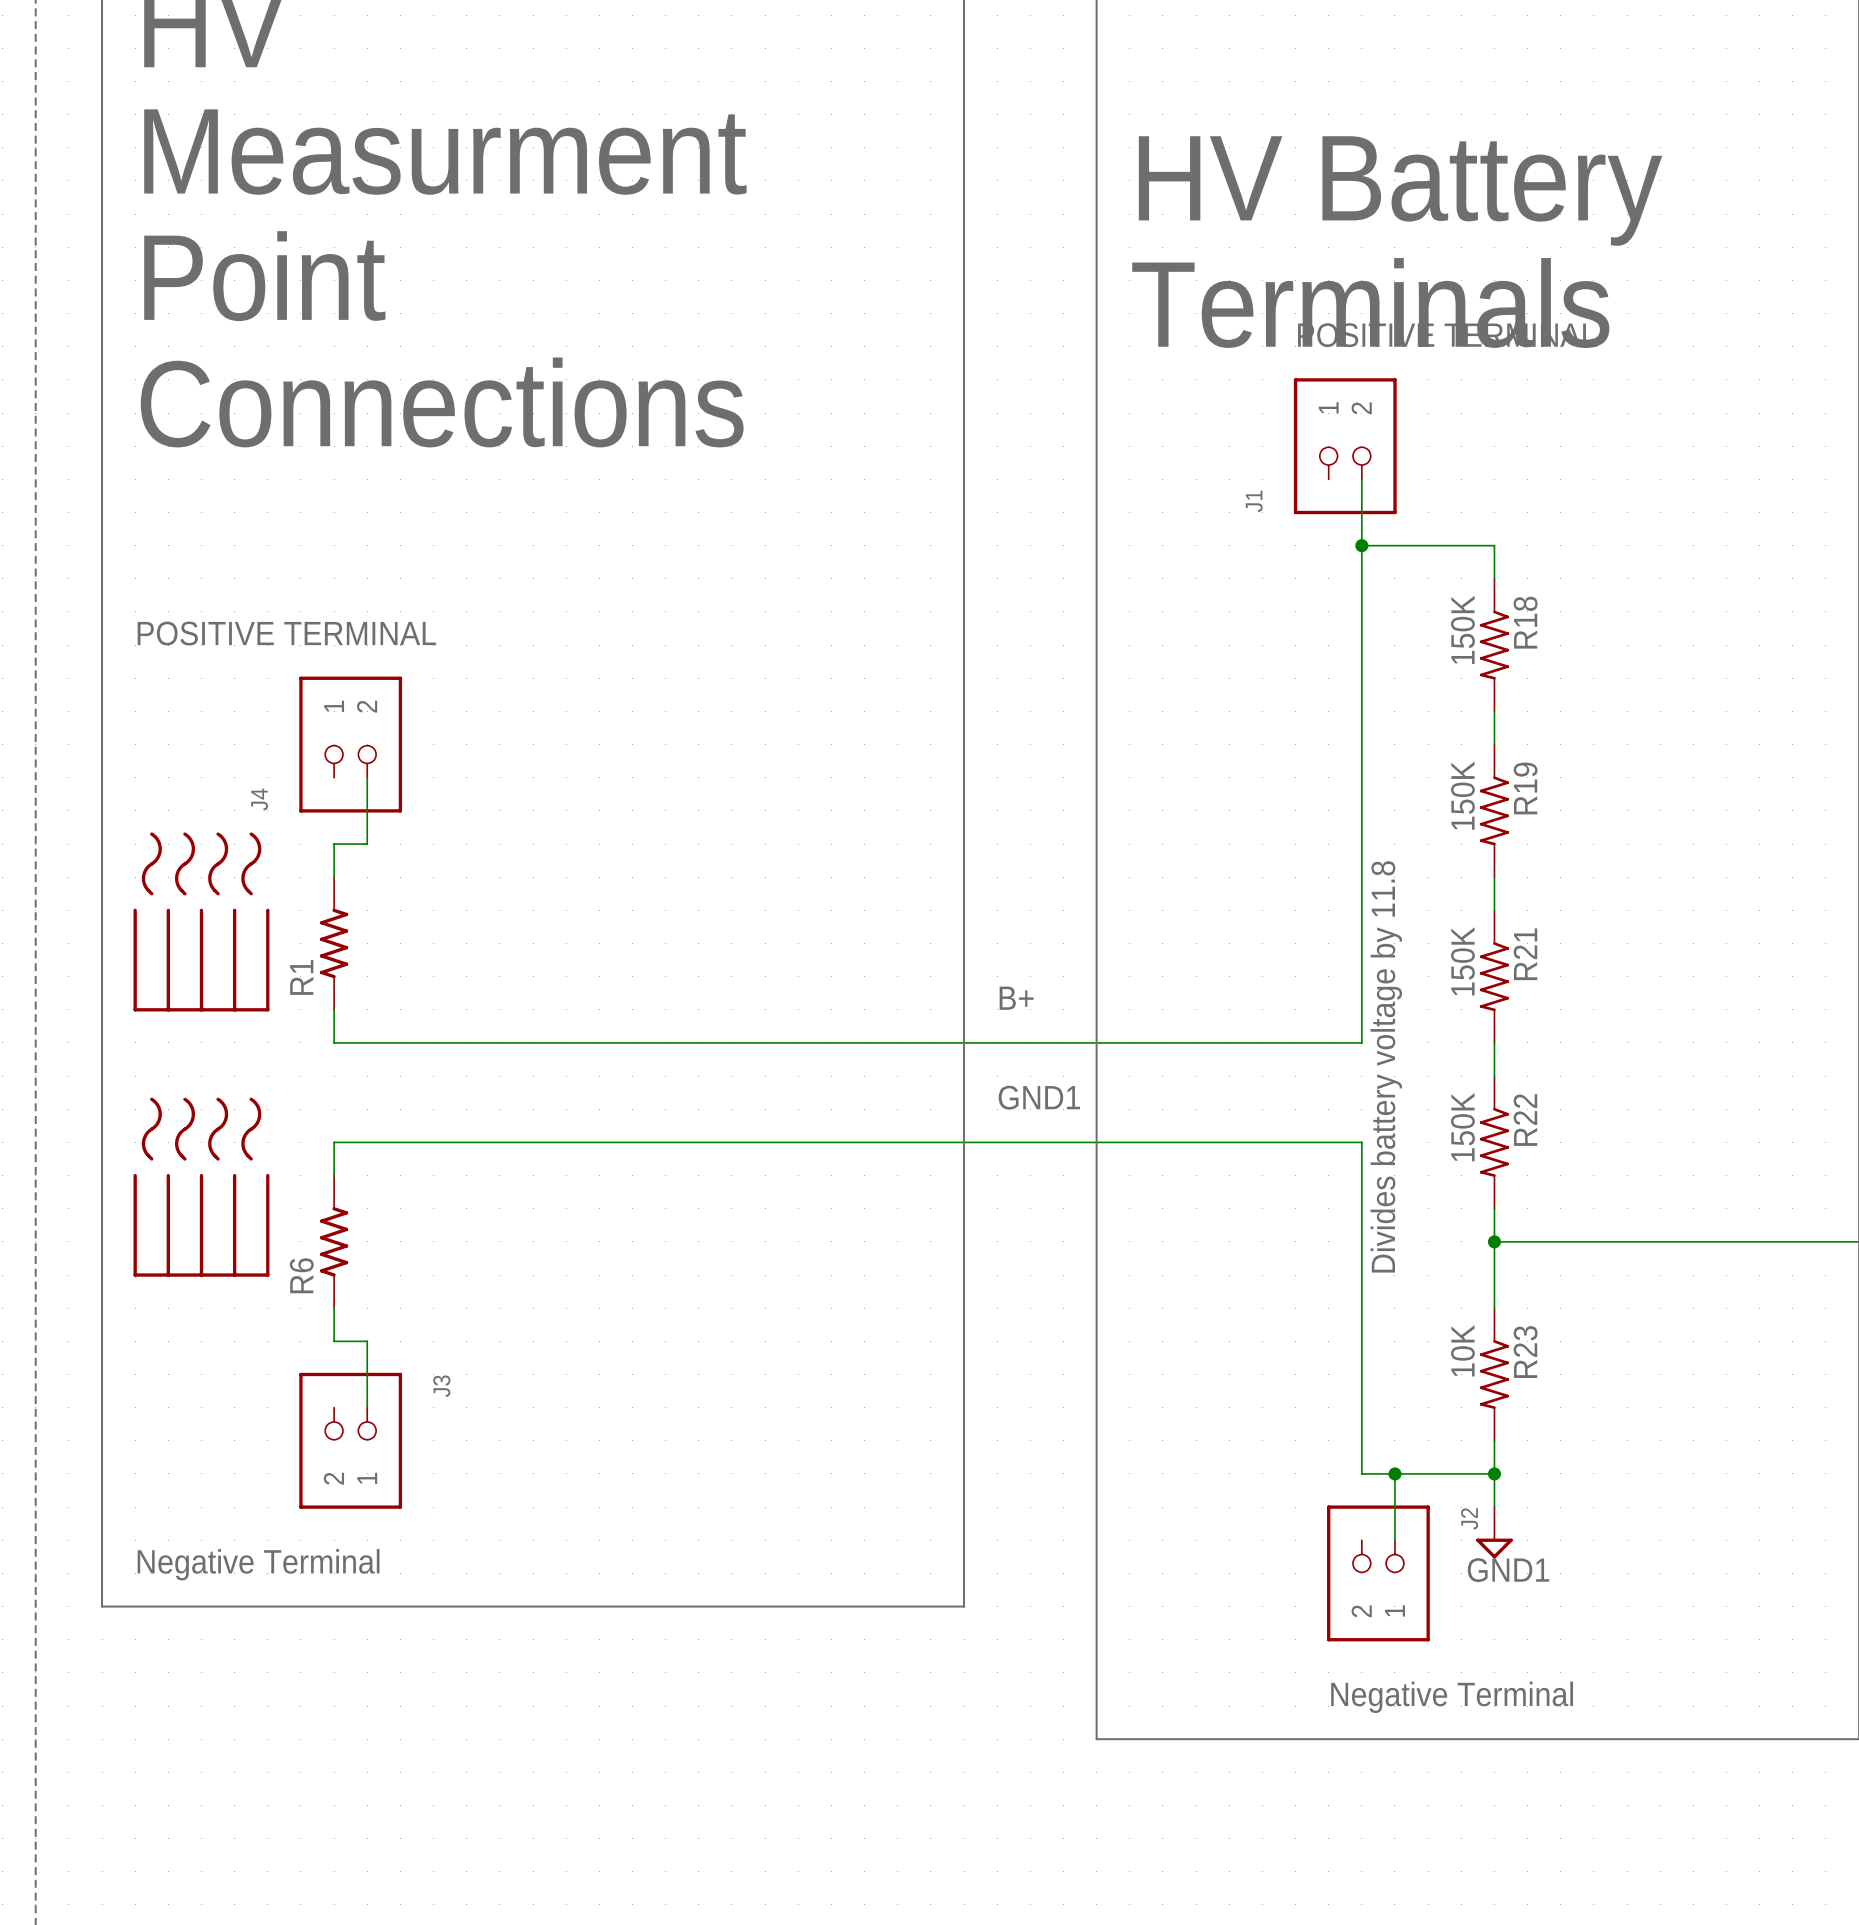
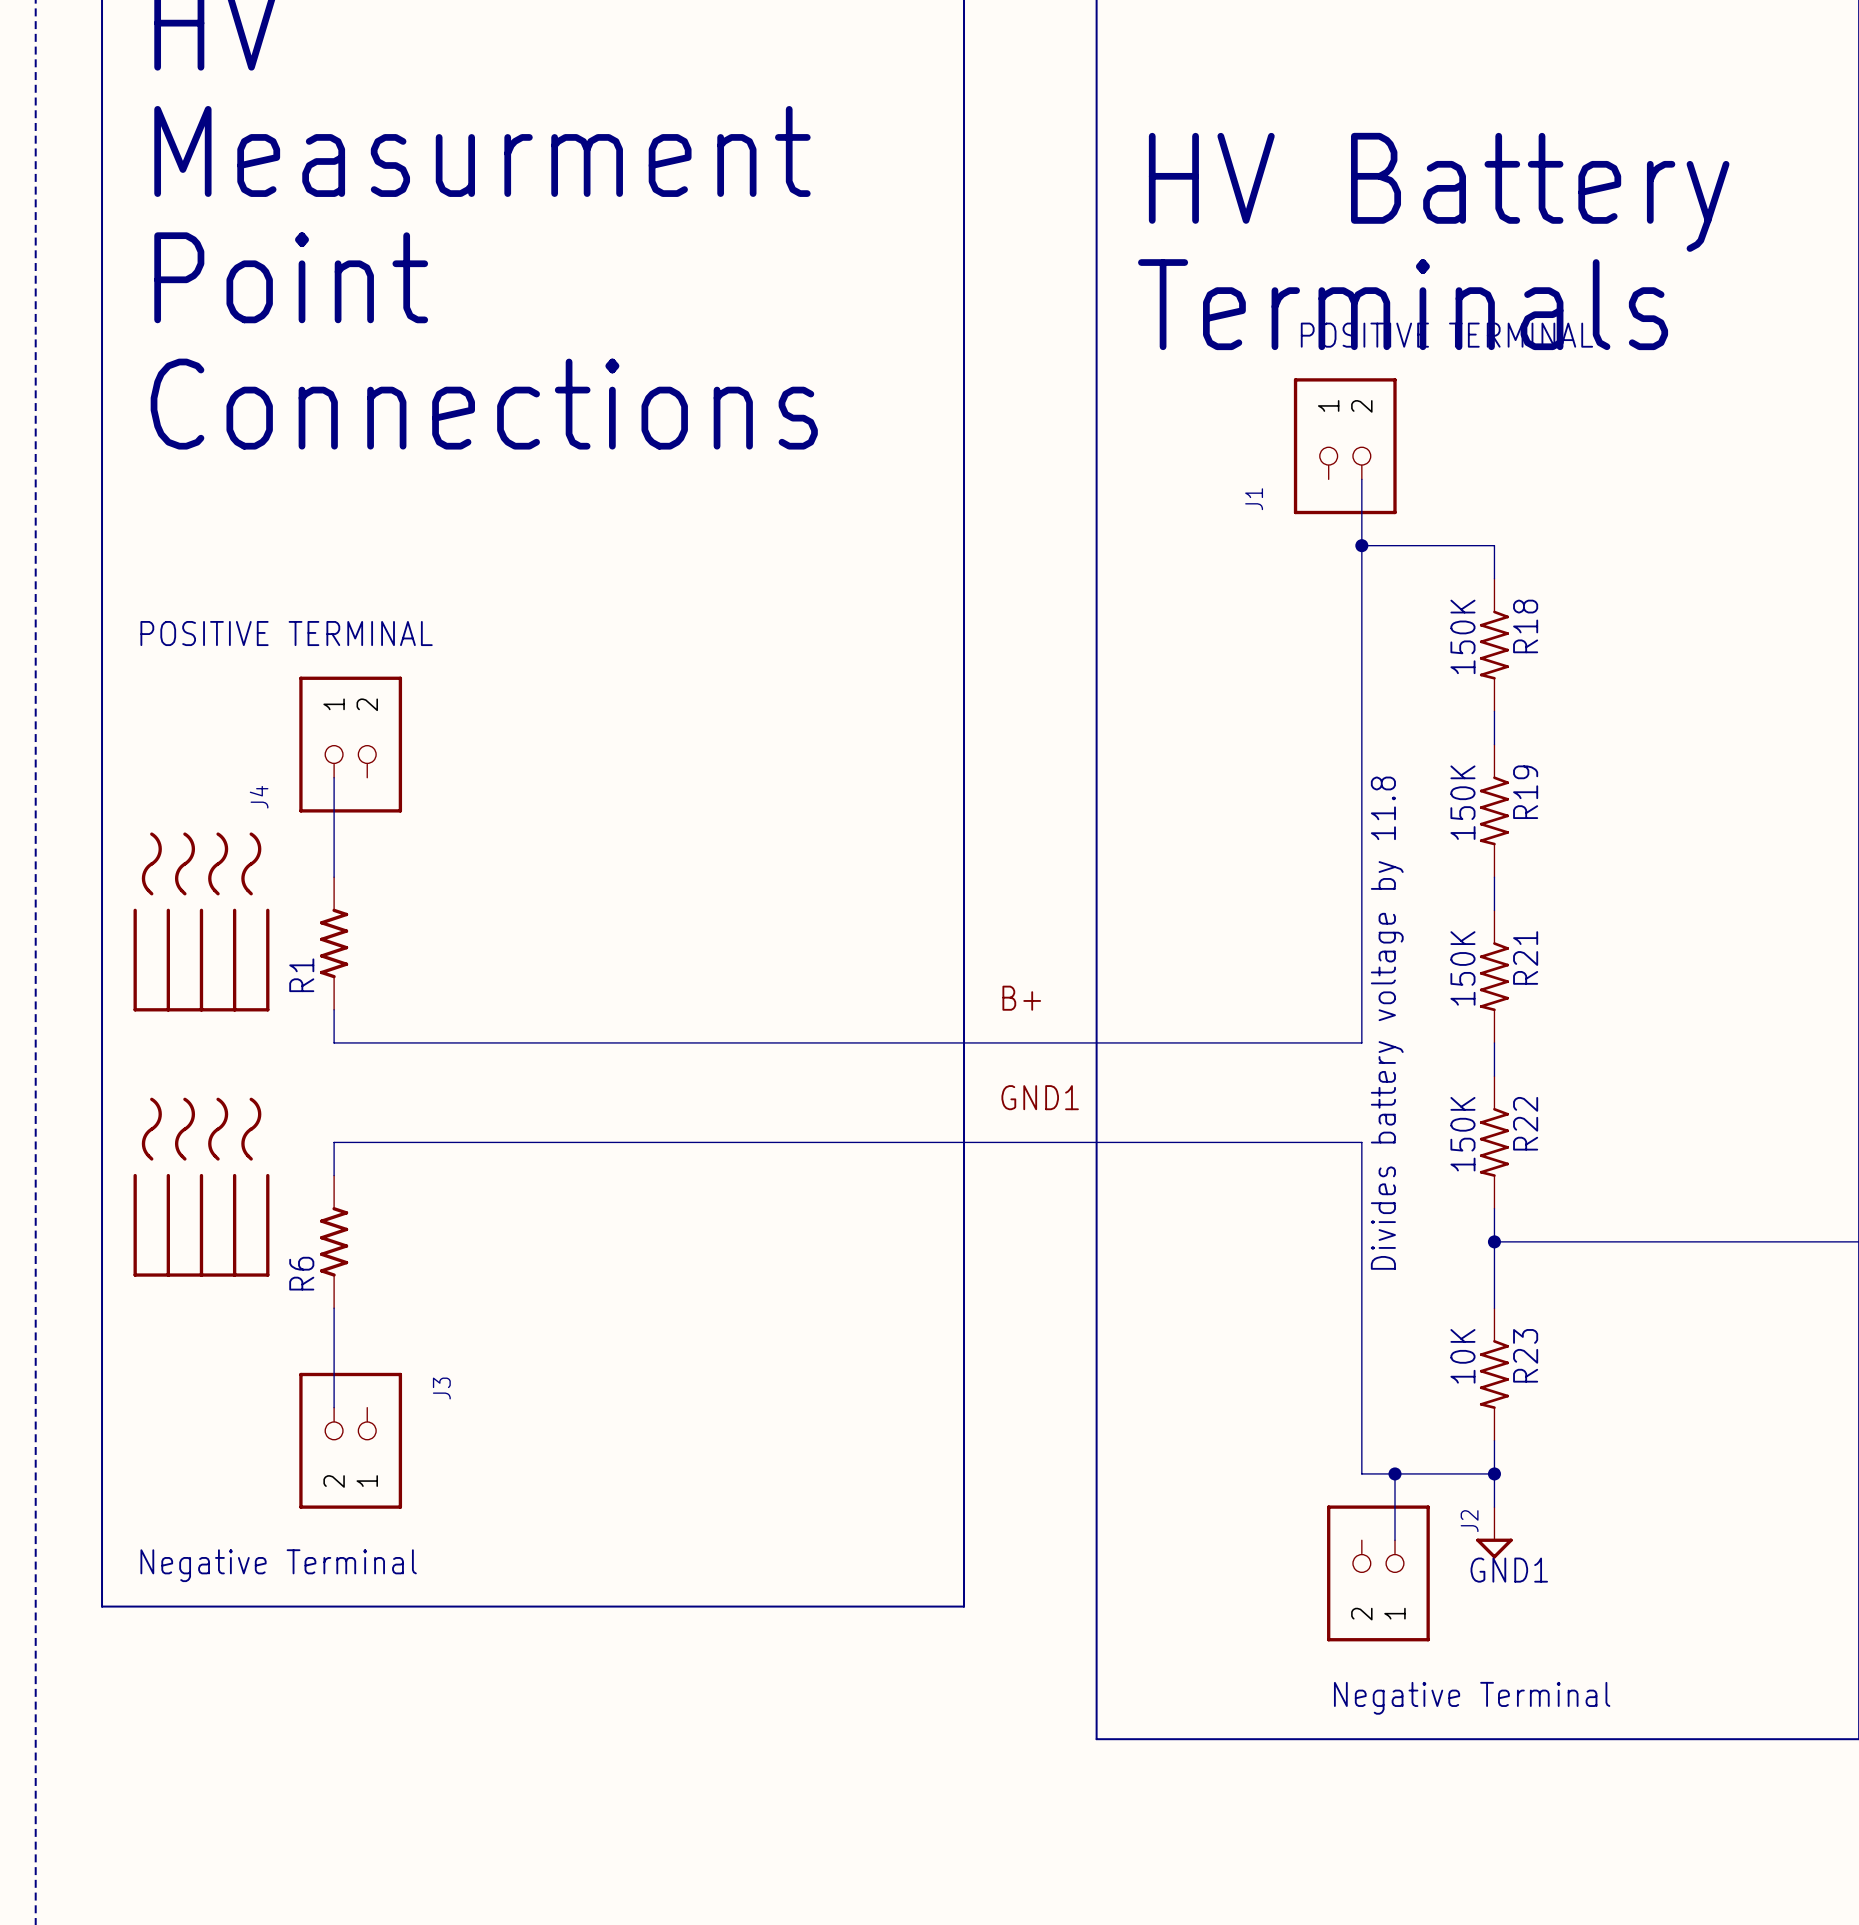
wire: (367, 777) (367, 844) (334, 844) -> (334, 777) (334, 844)
wire: (334, 1341) (367, 1341) (367, 1407) -> (334, 1341) (334, 1407)

